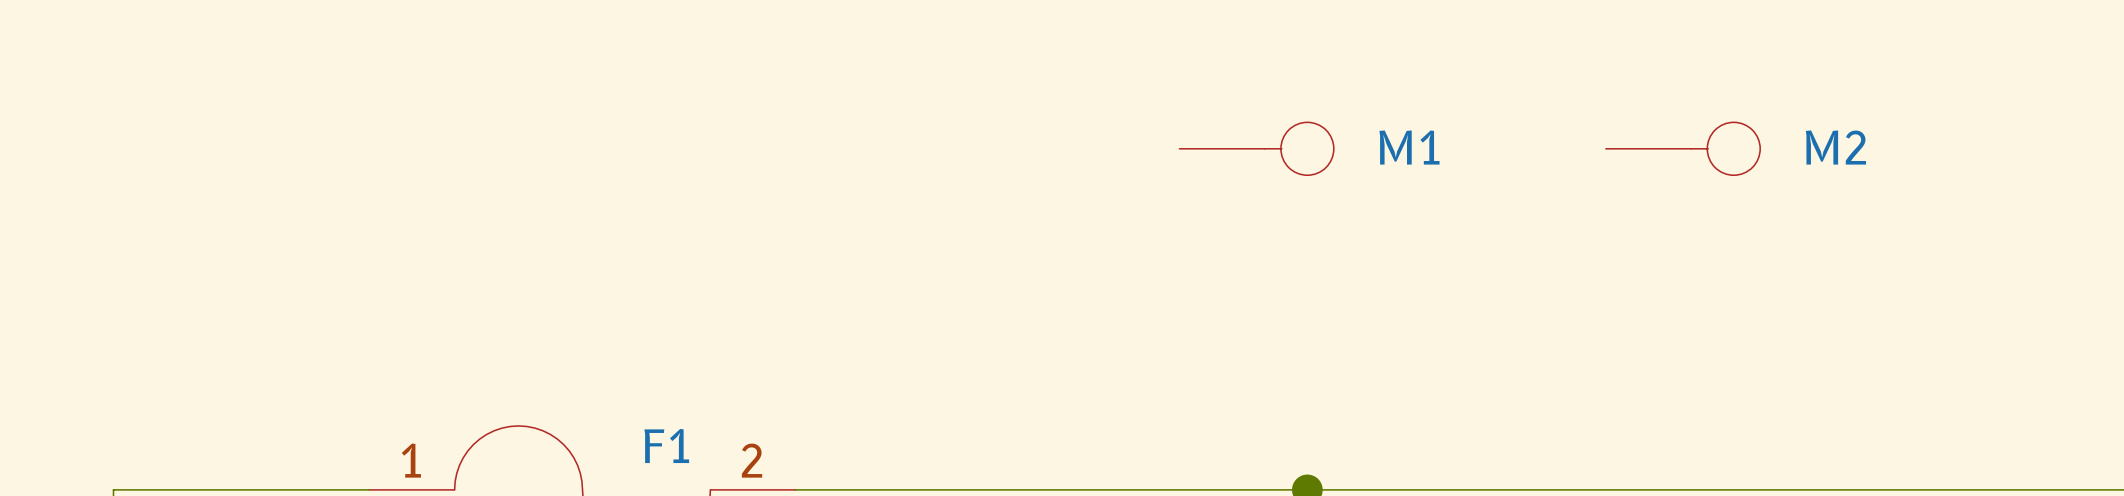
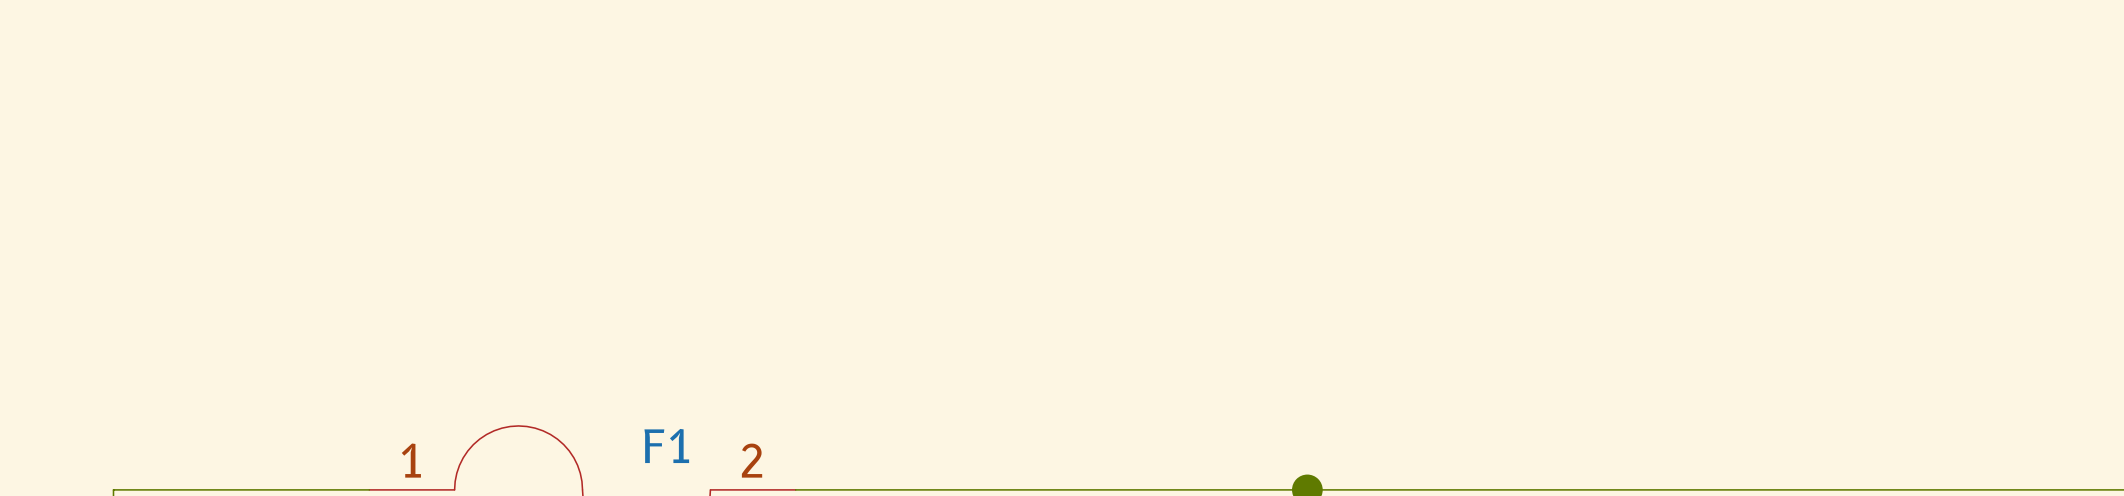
M1: (1256, 148) -> none
M2: (1683, 148) -> none

